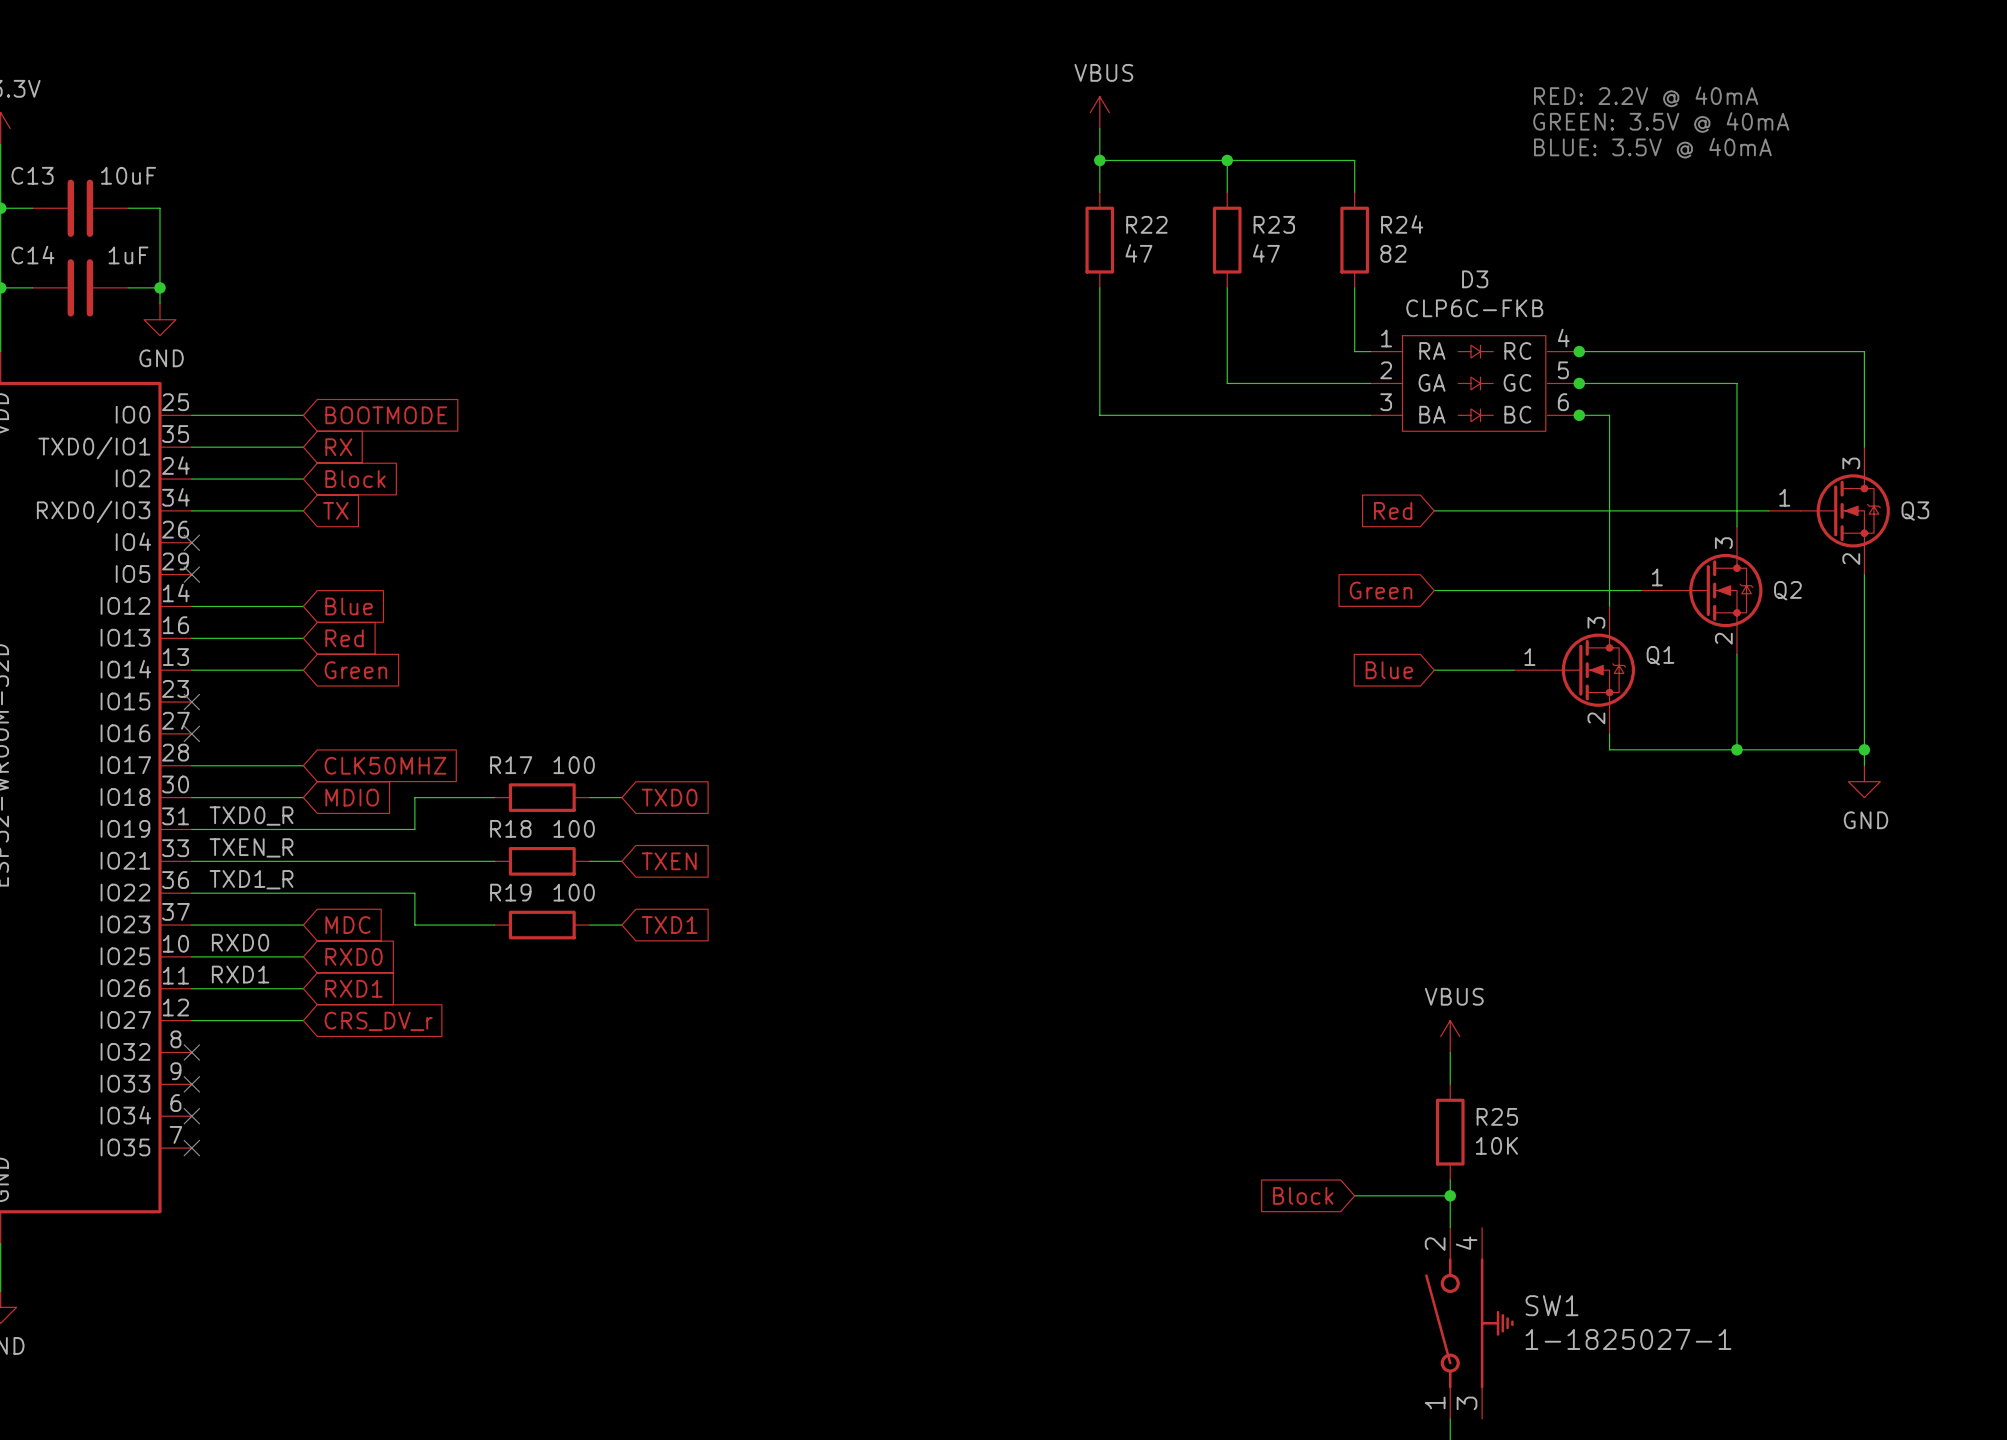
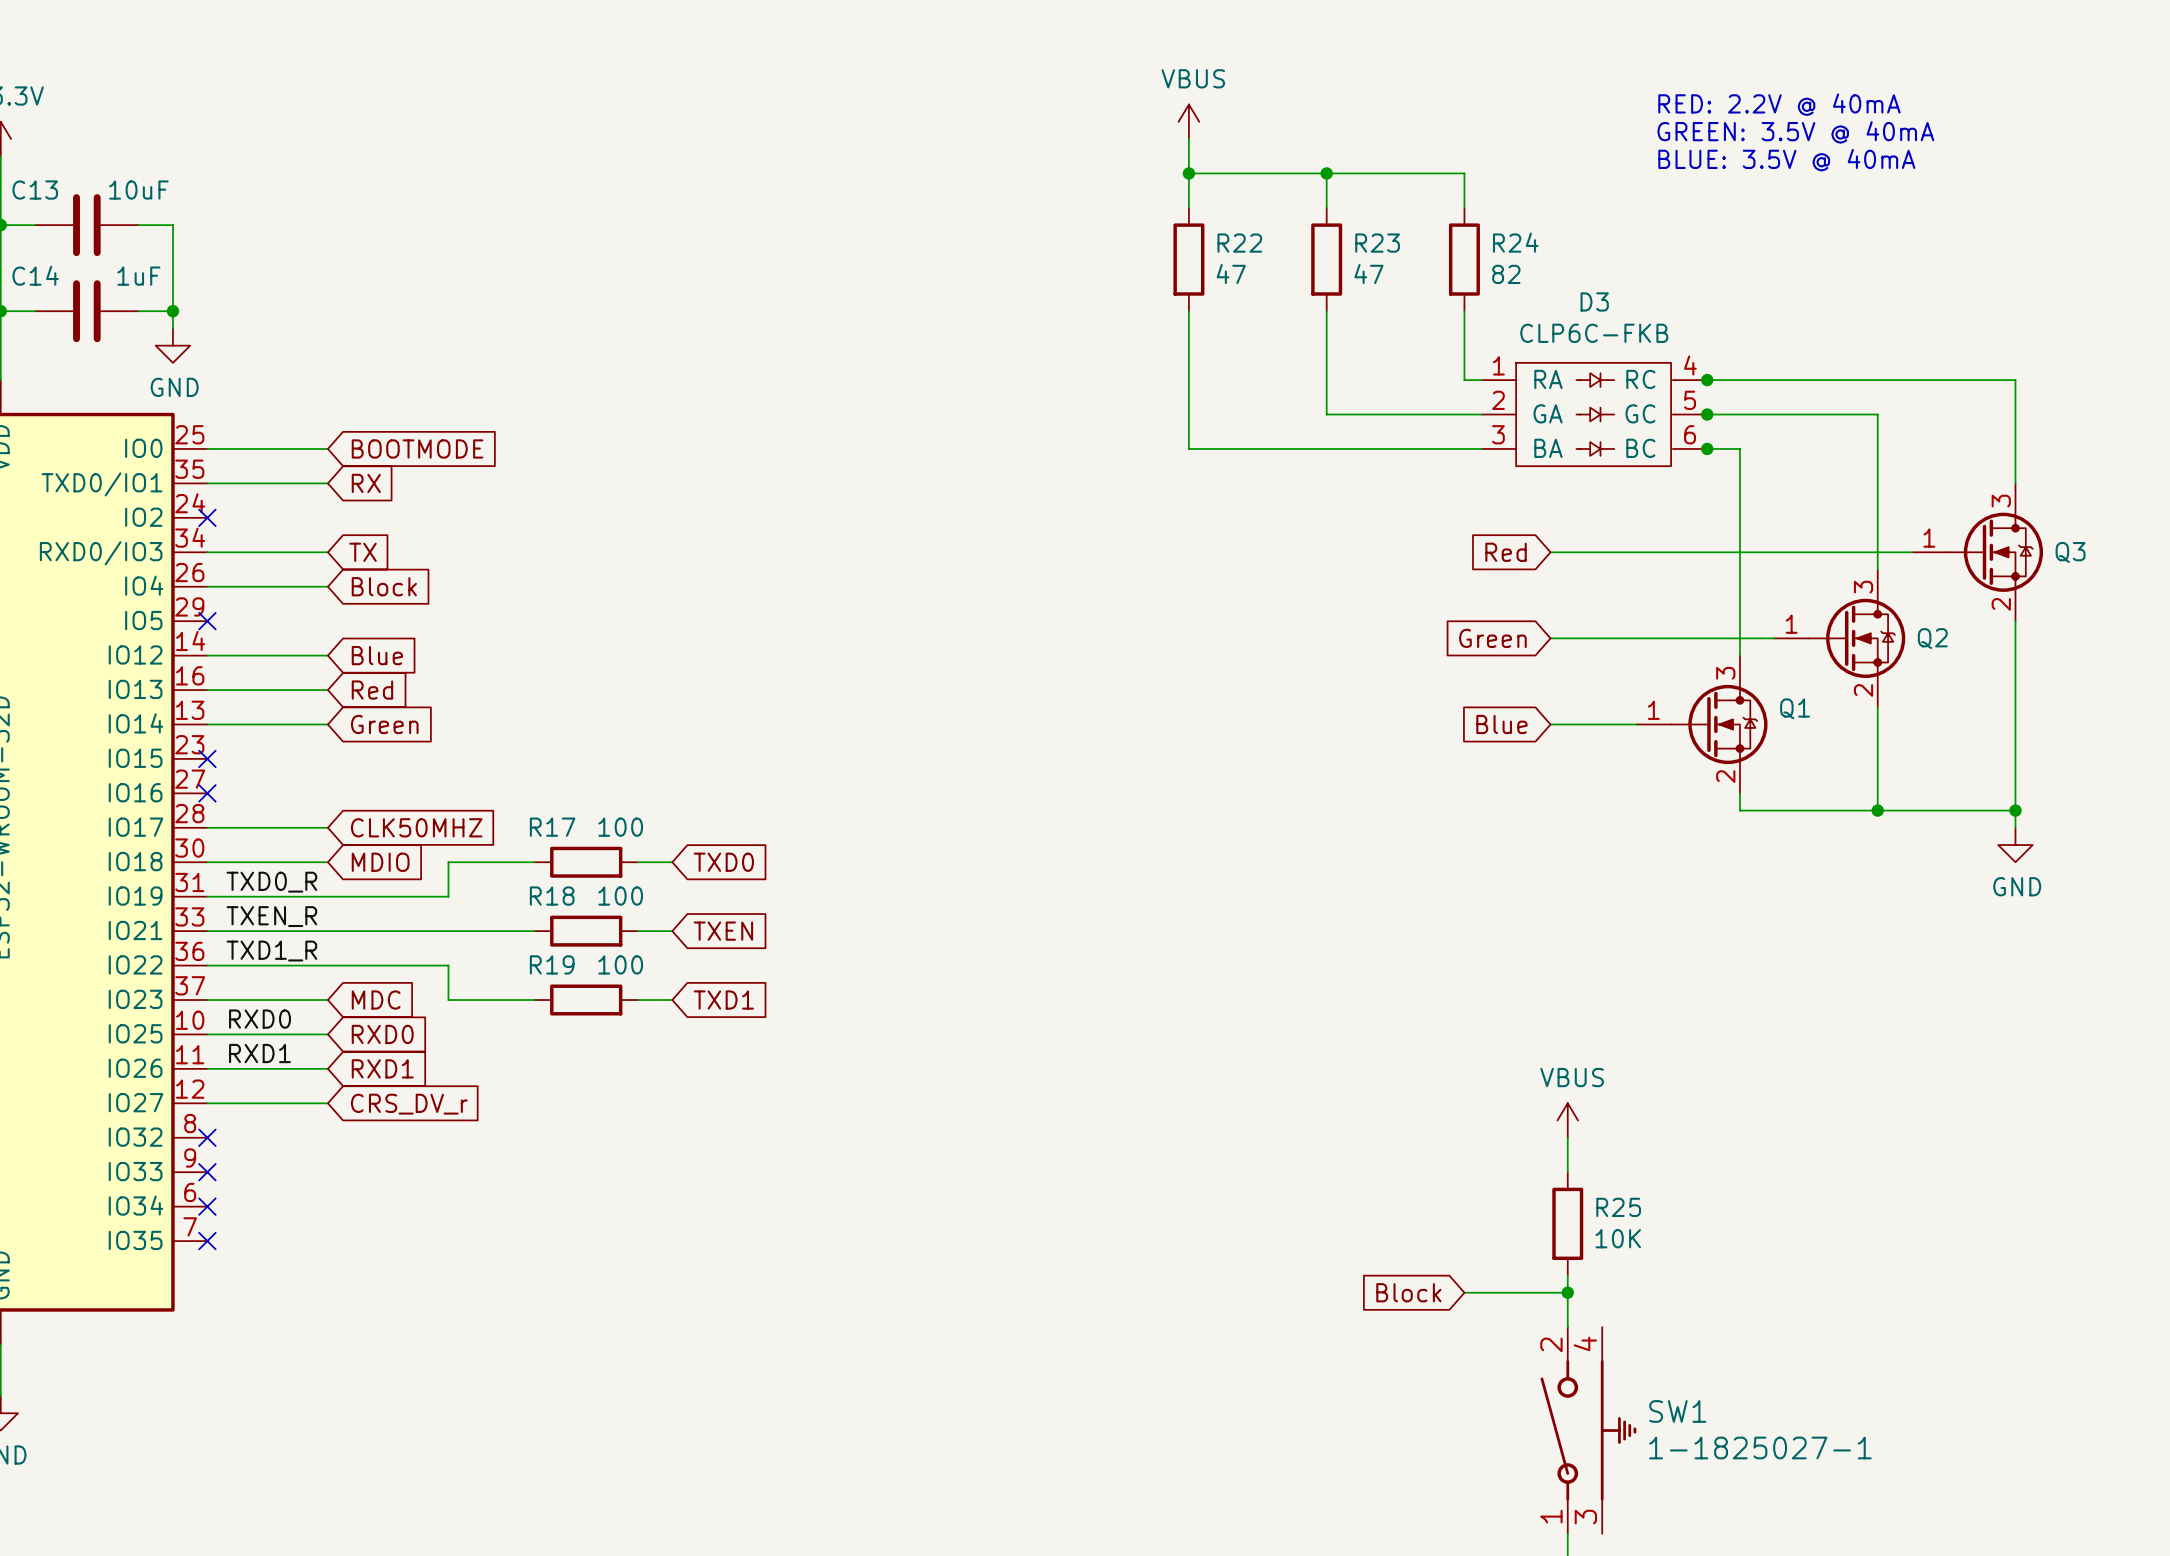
wire: (191, 479) (303, 479) -> (207, 586) (327, 586)
global label position: Block (355, 479) -> Block (384, 586)
no-connect mark position: (191, 542) -> (207, 517)

